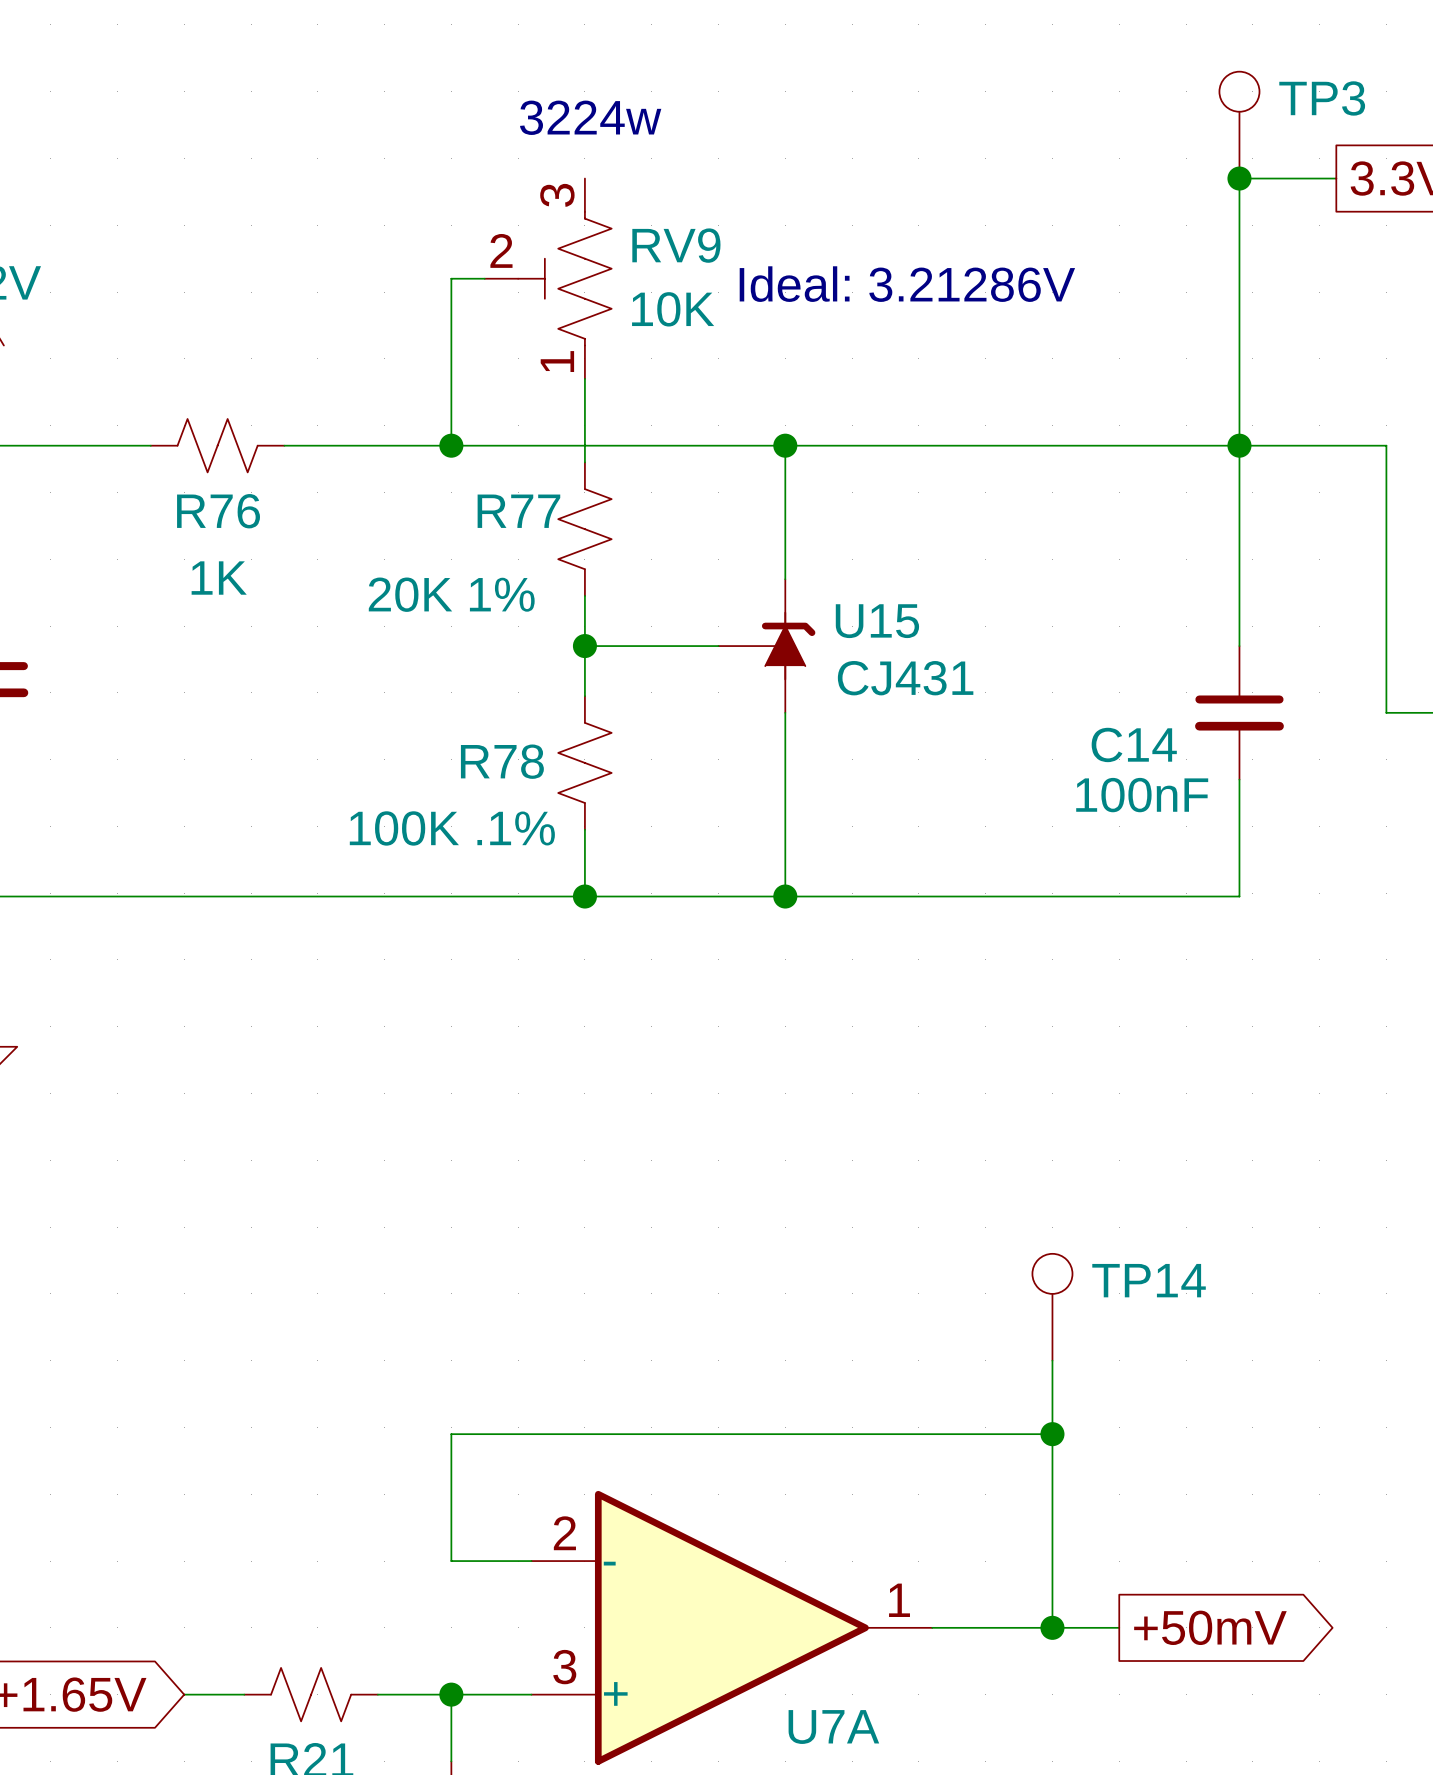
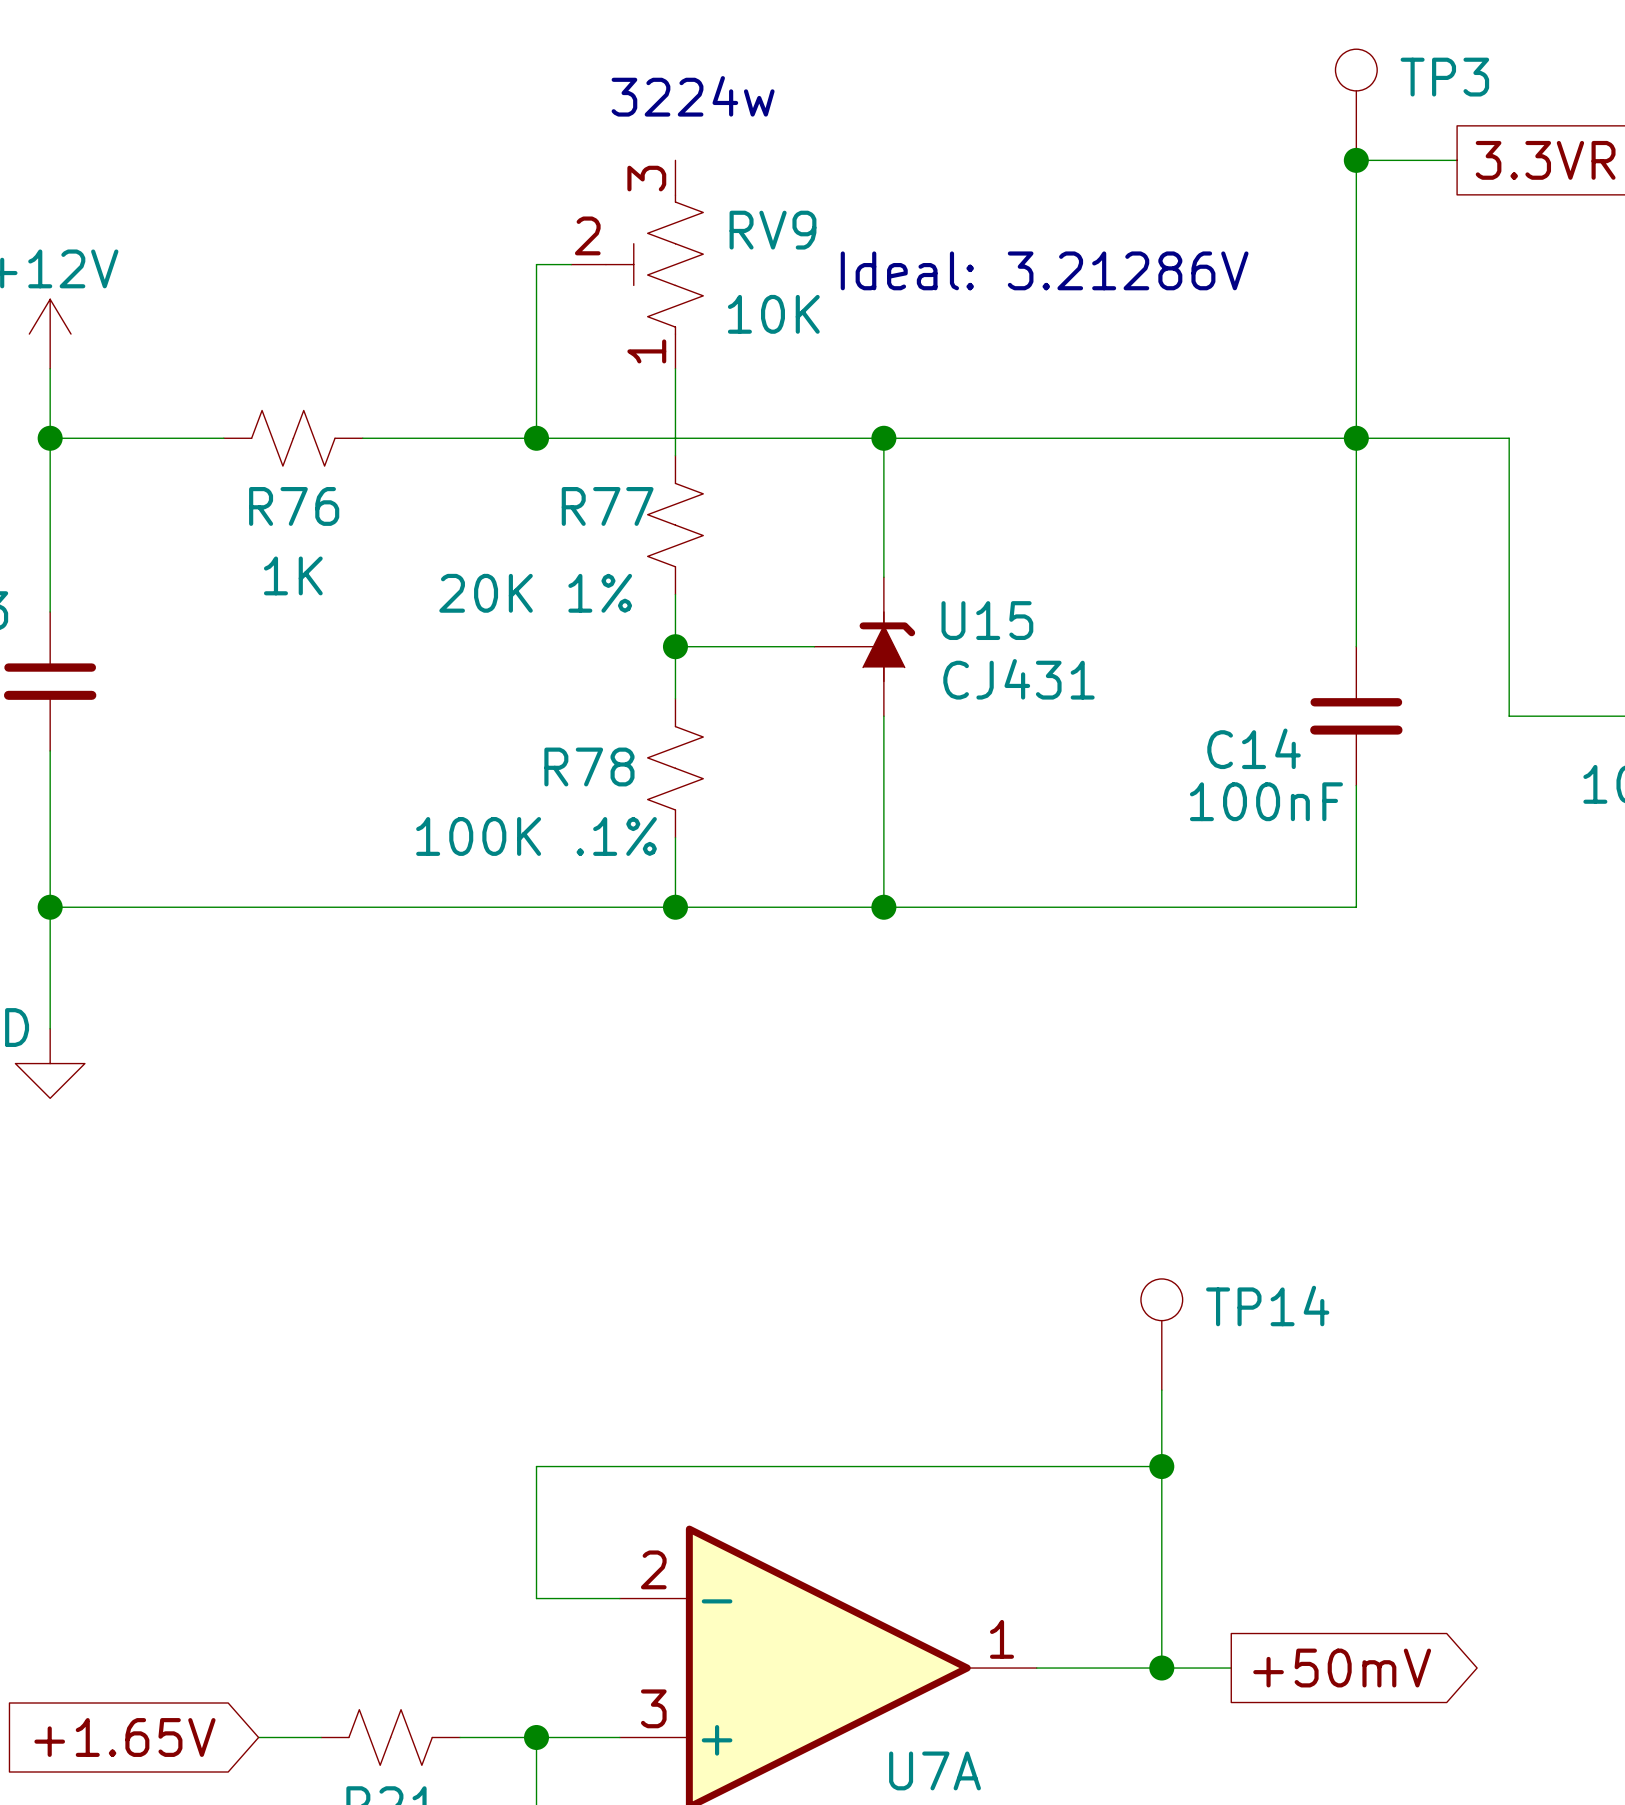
RV9 value position: 10K (673, 309) -> 10K (773, 314)

